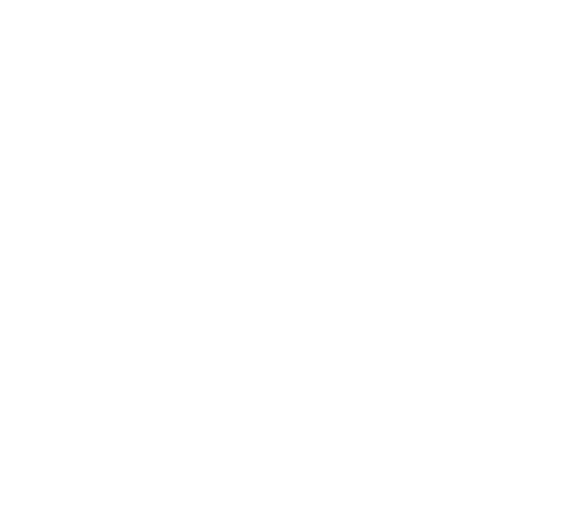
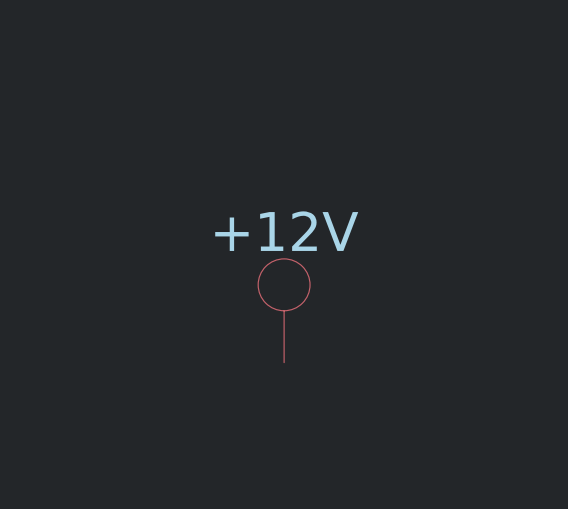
power symbol: none -> +12V (284, 310)

